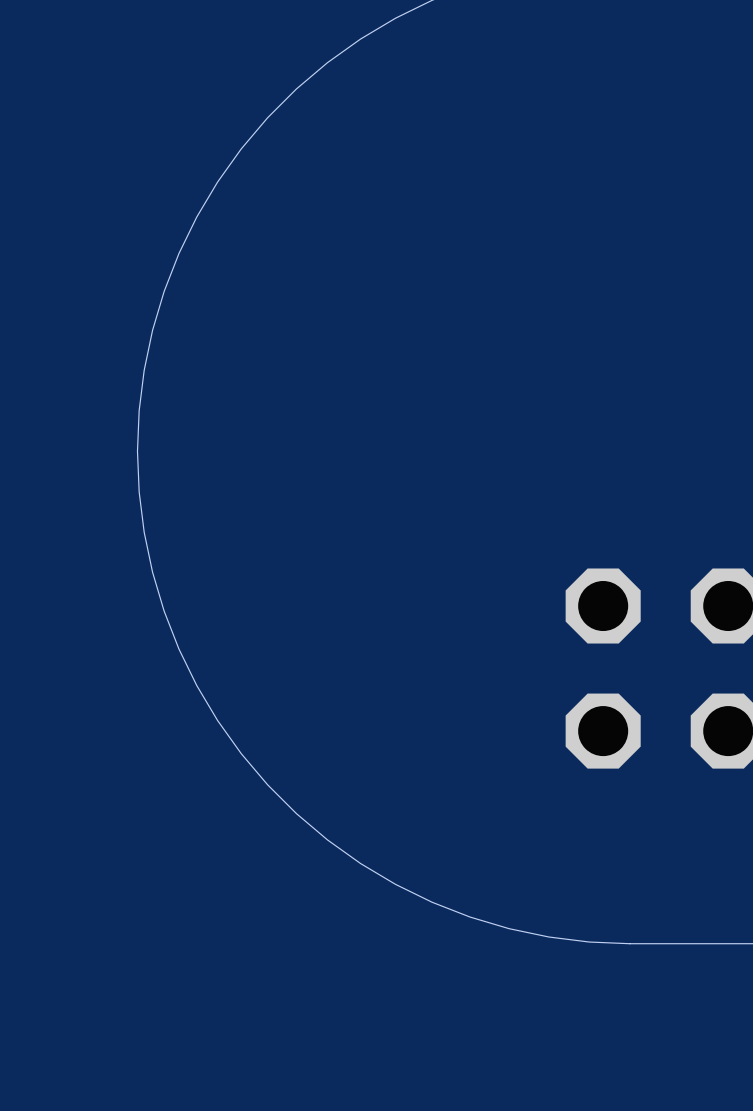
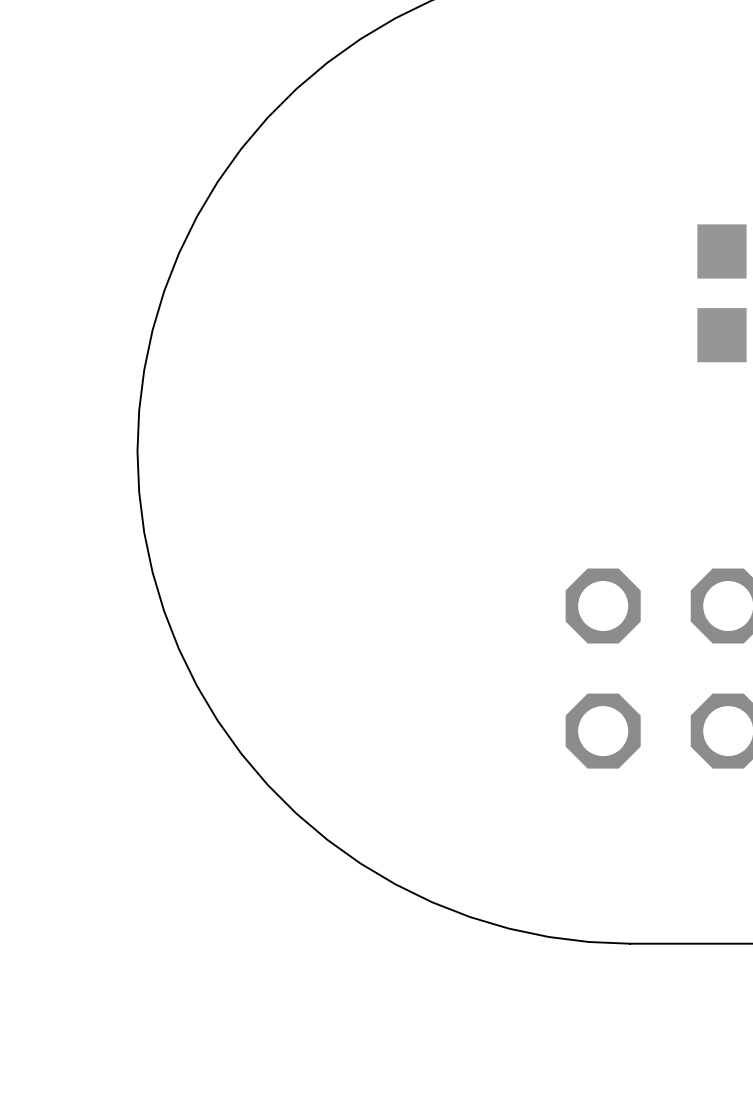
part: none -> (721, 293)

